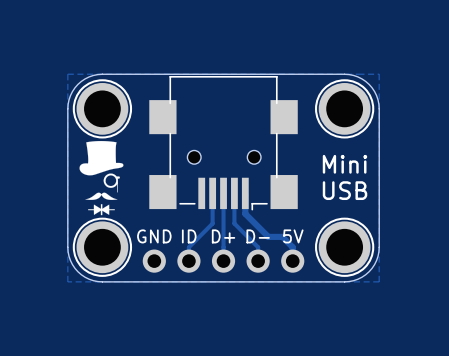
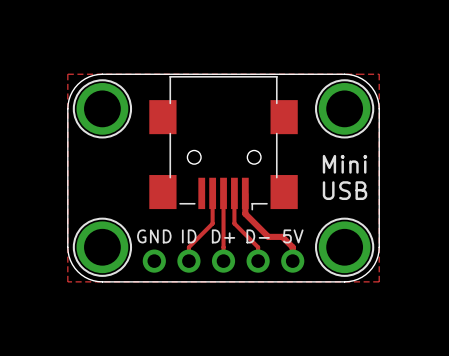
drawing: [79, 140, 124, 216] -> none

